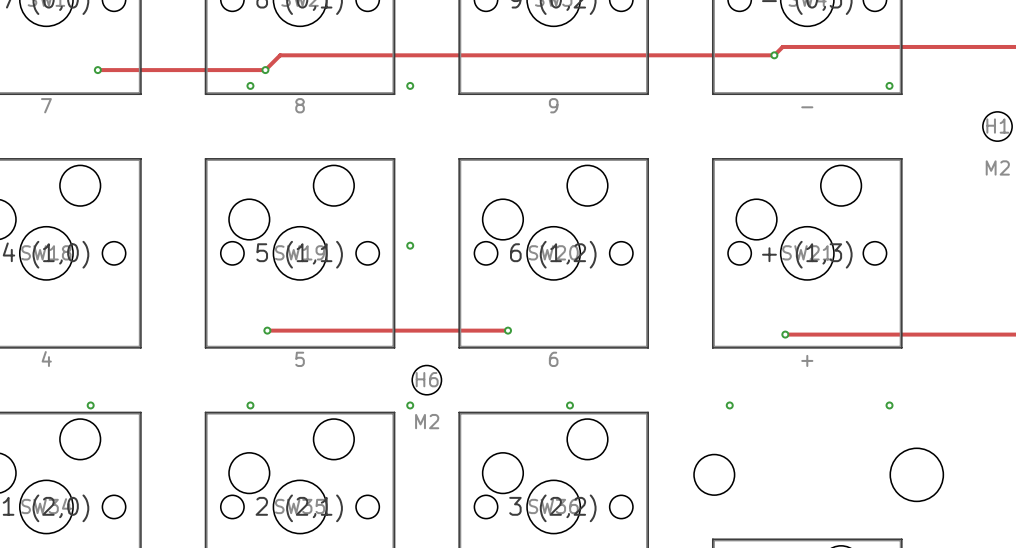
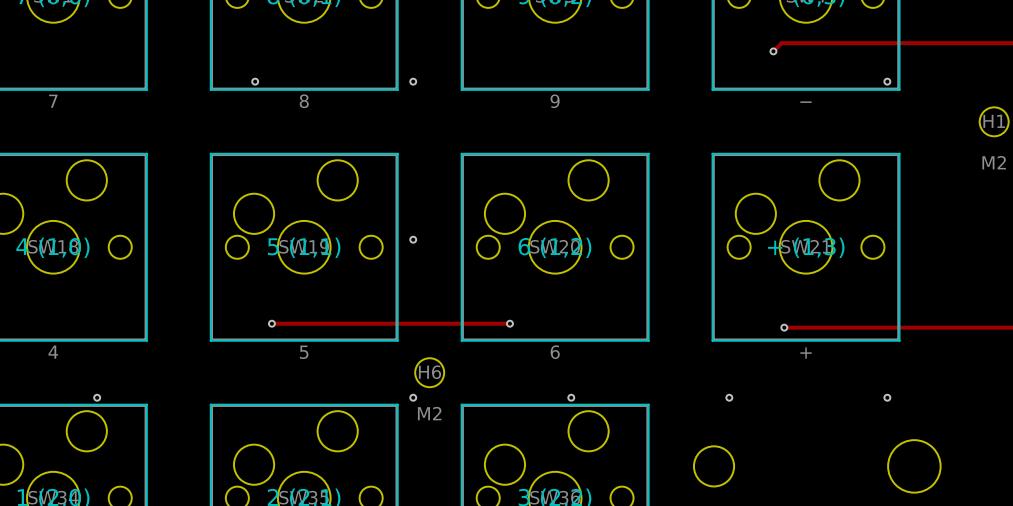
track: (774, 55) (280, 55) (265, 70) (97, 70) -> none
via: (97, 70) -> none
via: (265, 70) -> none
via: (250, 405) -> none

